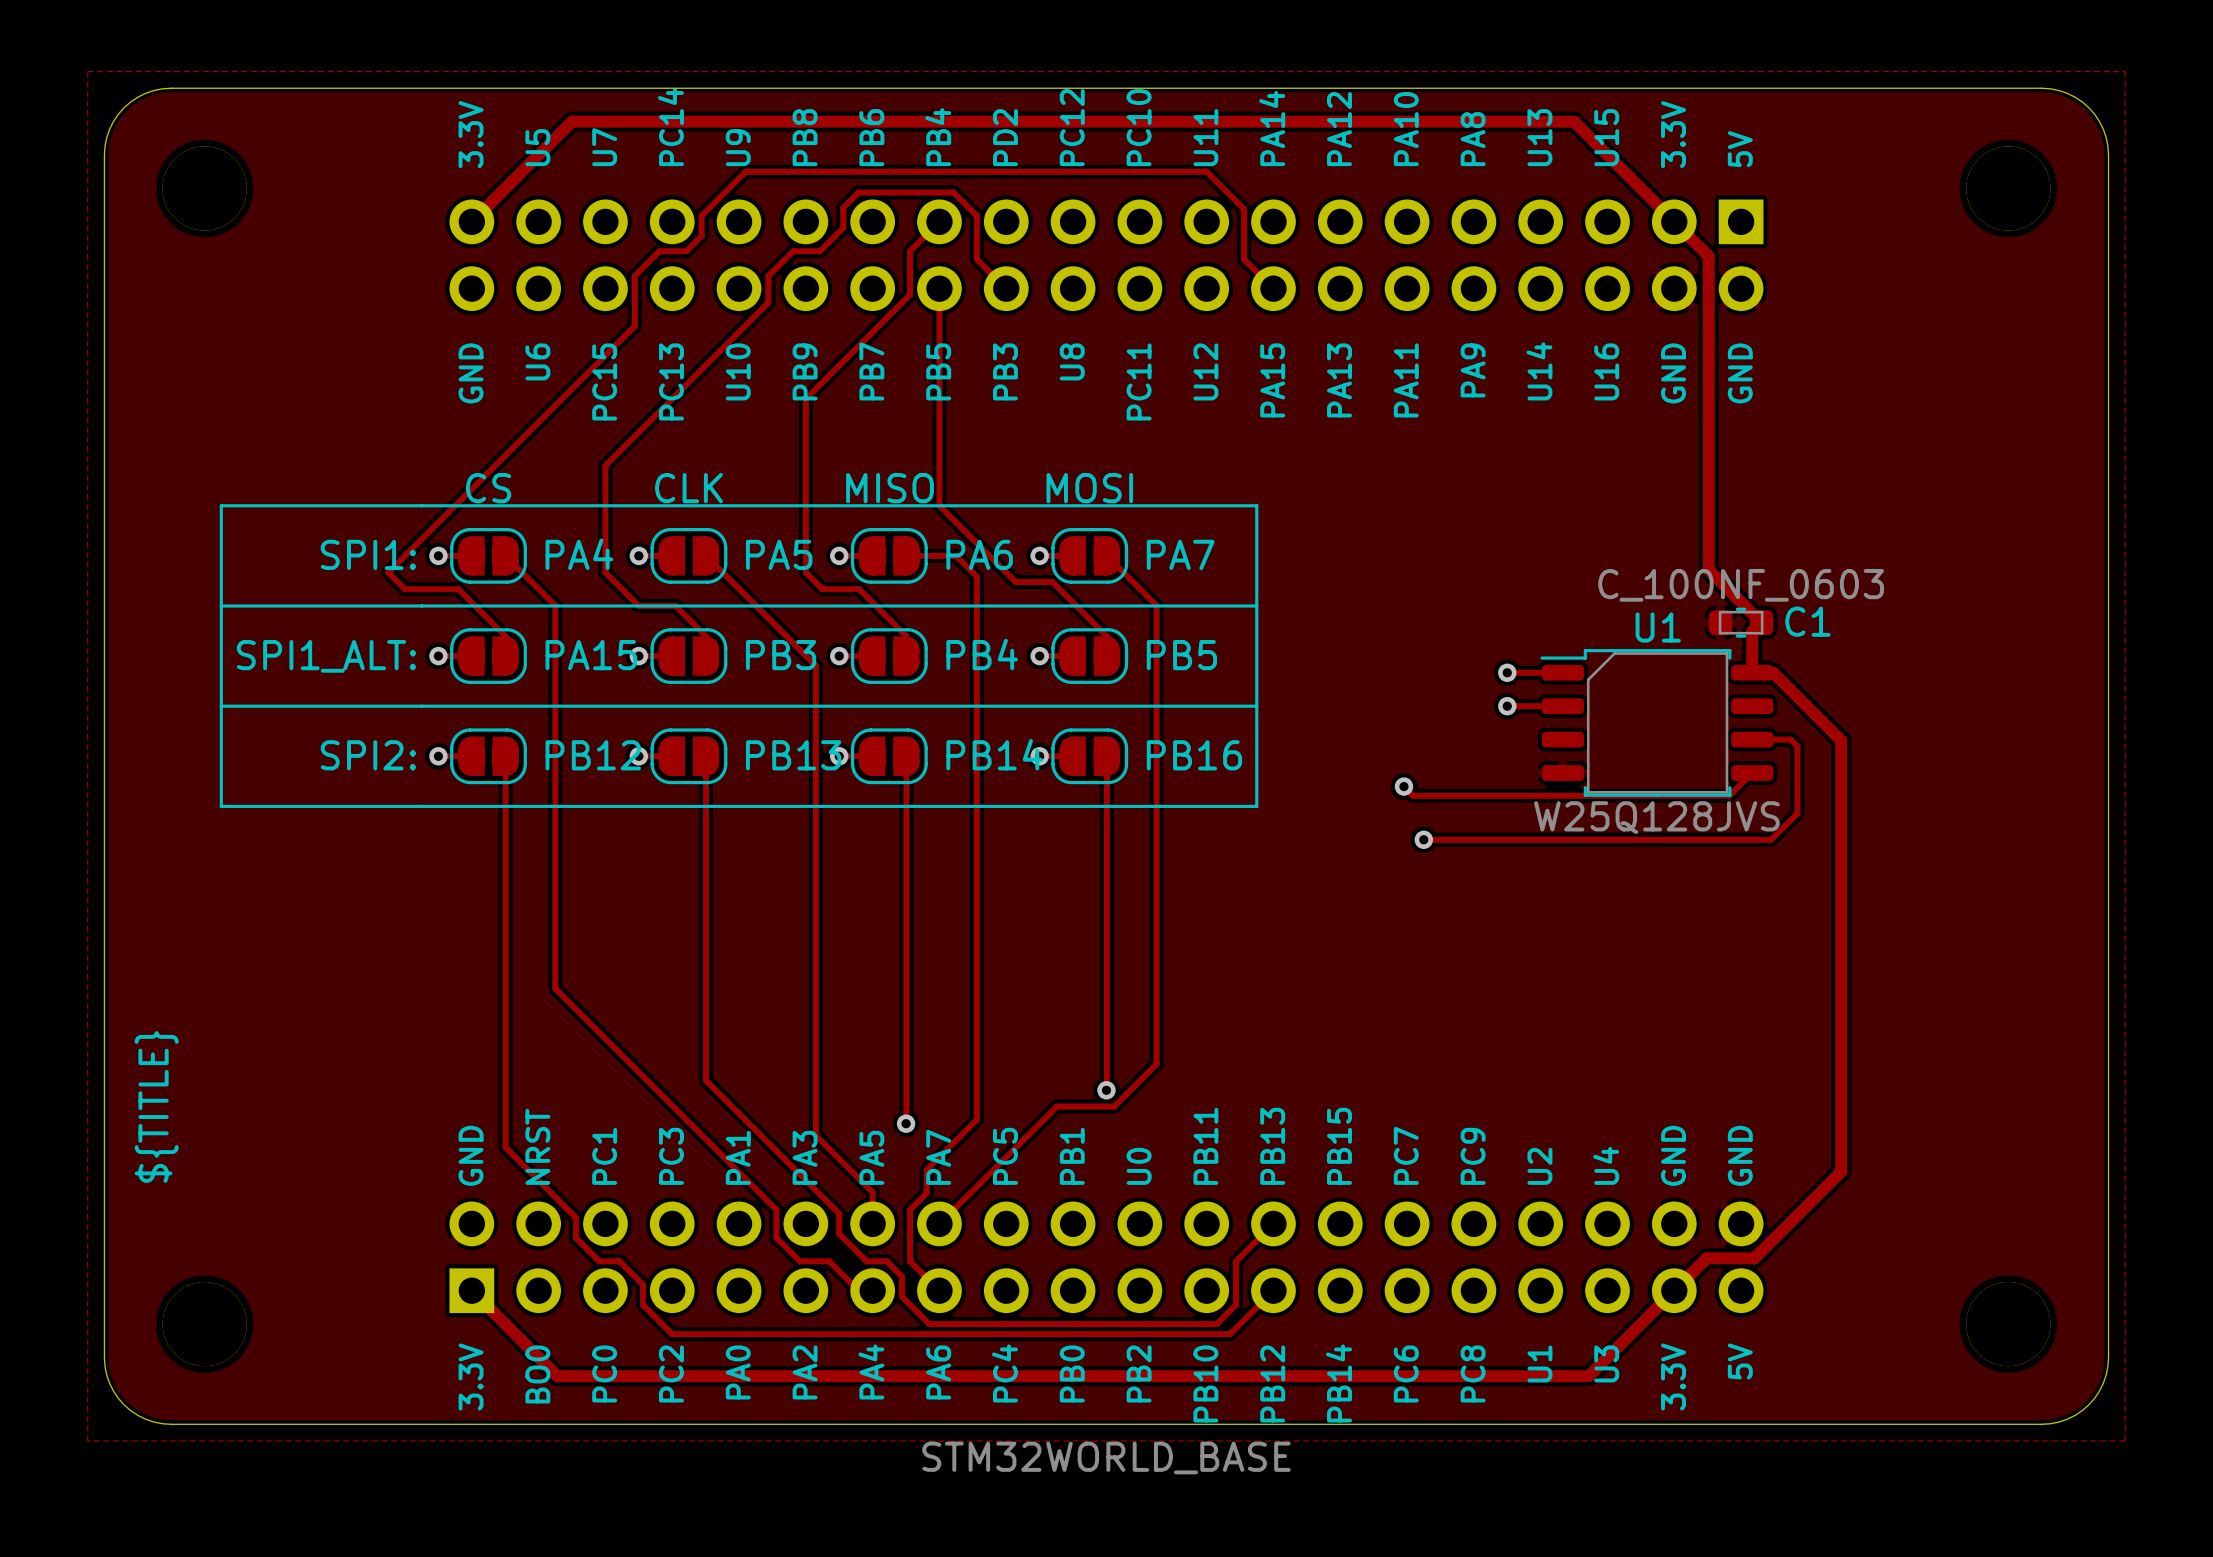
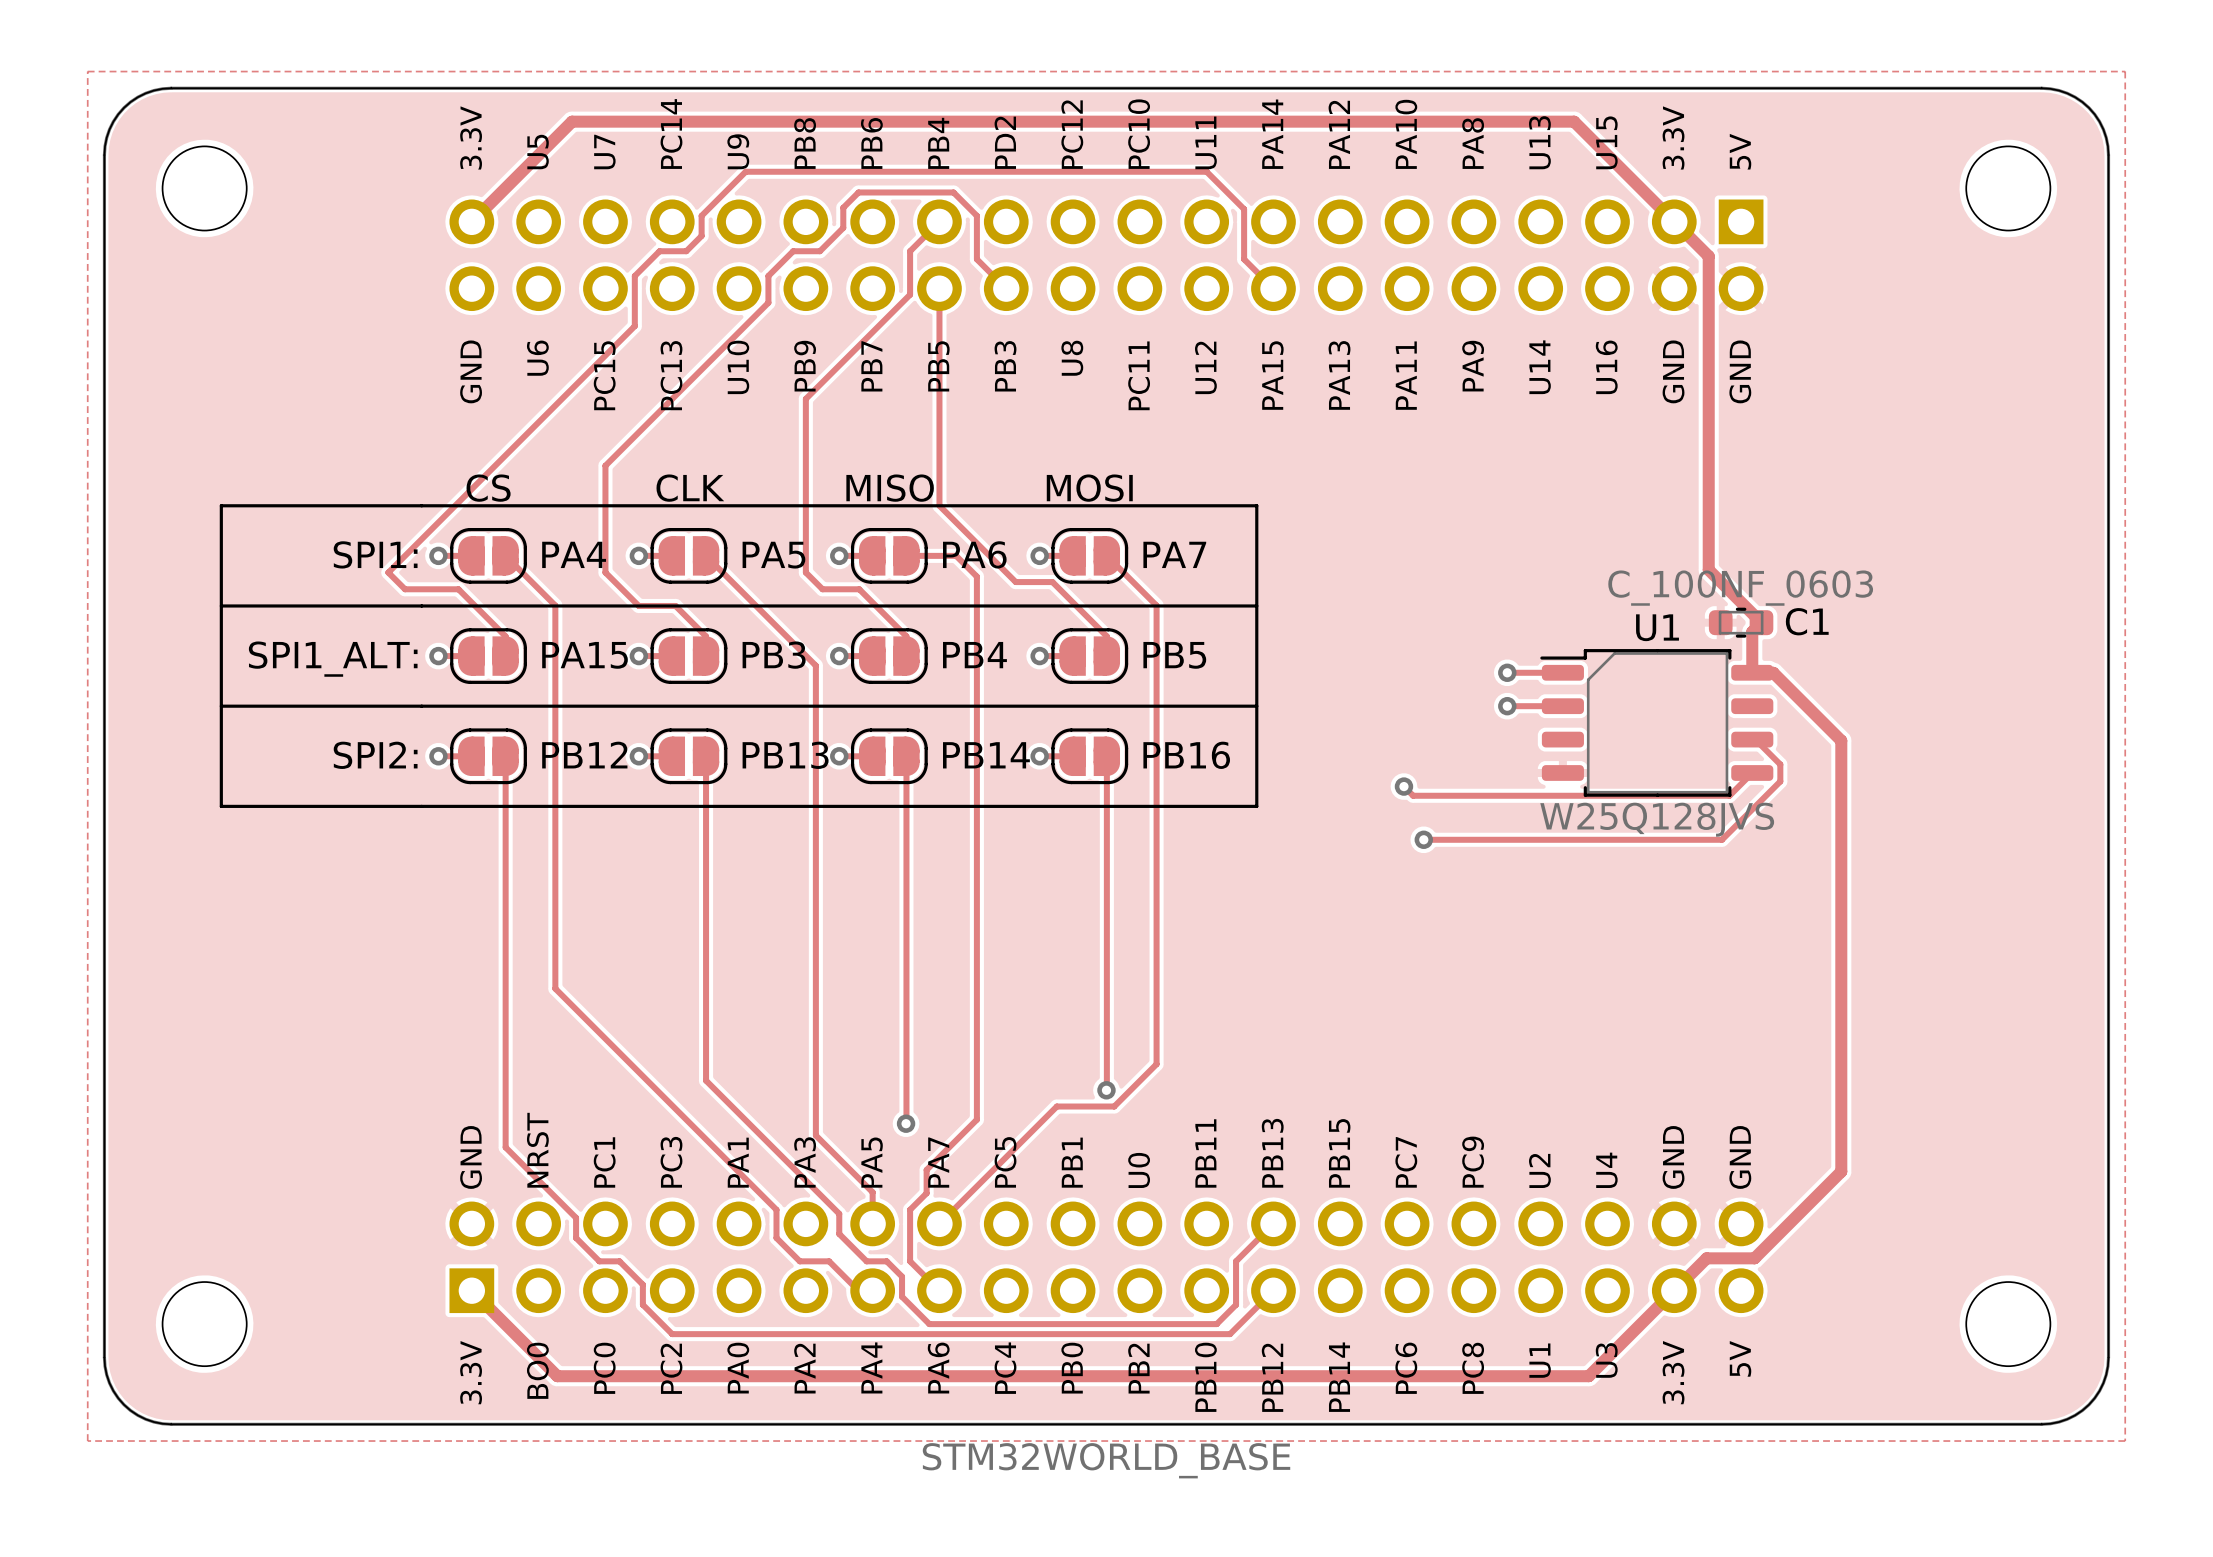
part footprint: [162, 146, 2051, 1367] -> [102, 86, 2111, 1426]
track: (1755, 739) (1790, 739) (1797, 746) (1797, 813) (1771, 839) (1722, 839) -> (1755, 739) (1780, 764) (1780, 781) (1722, 839)
text: ${TITLE} (156, 1107) -> none

